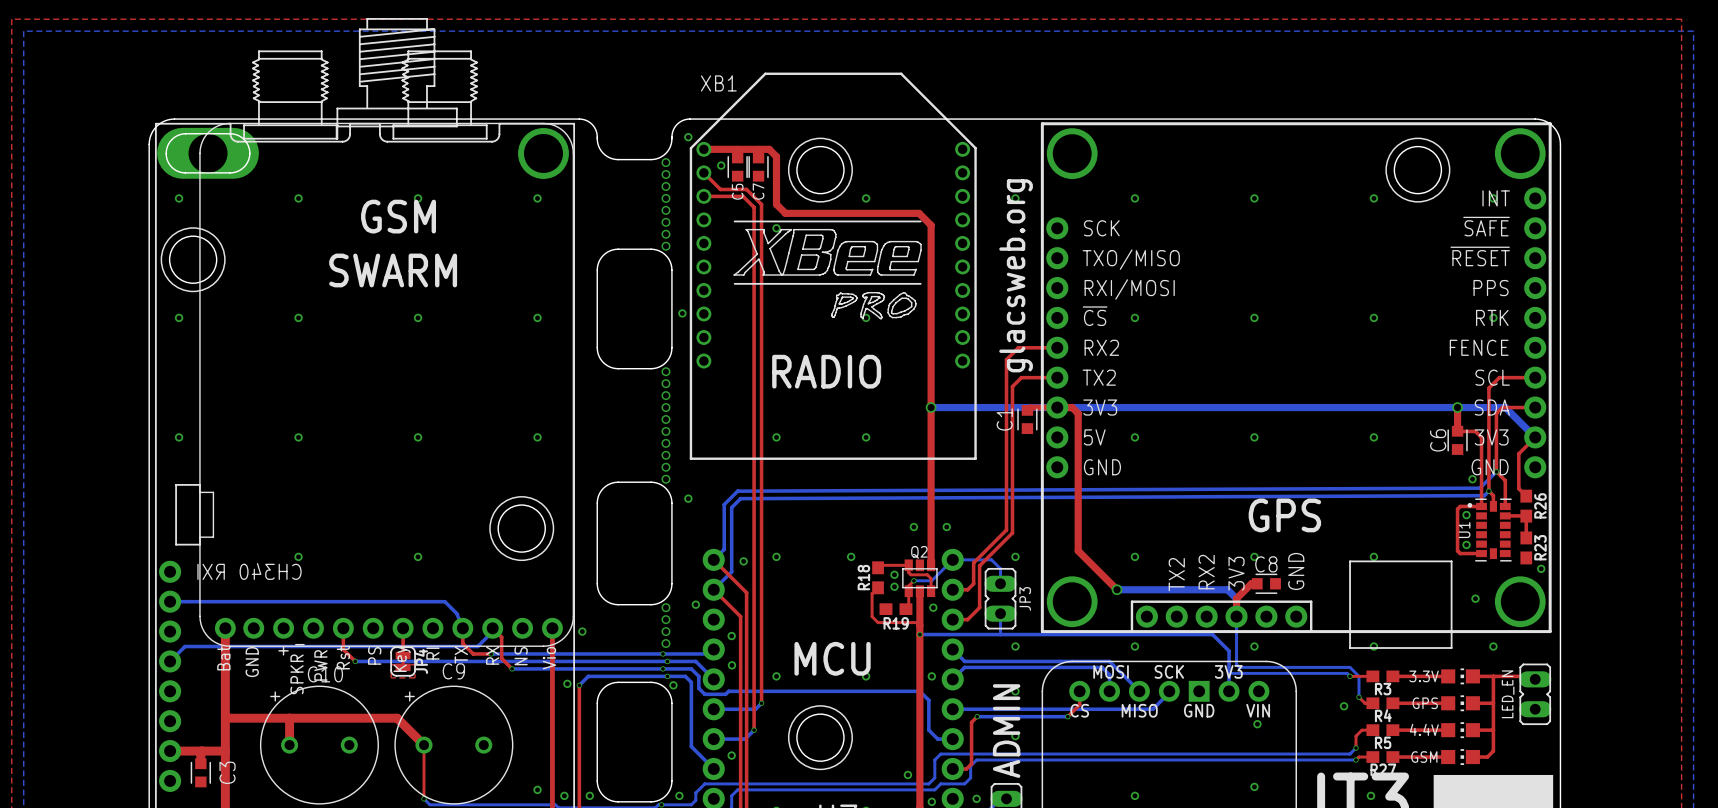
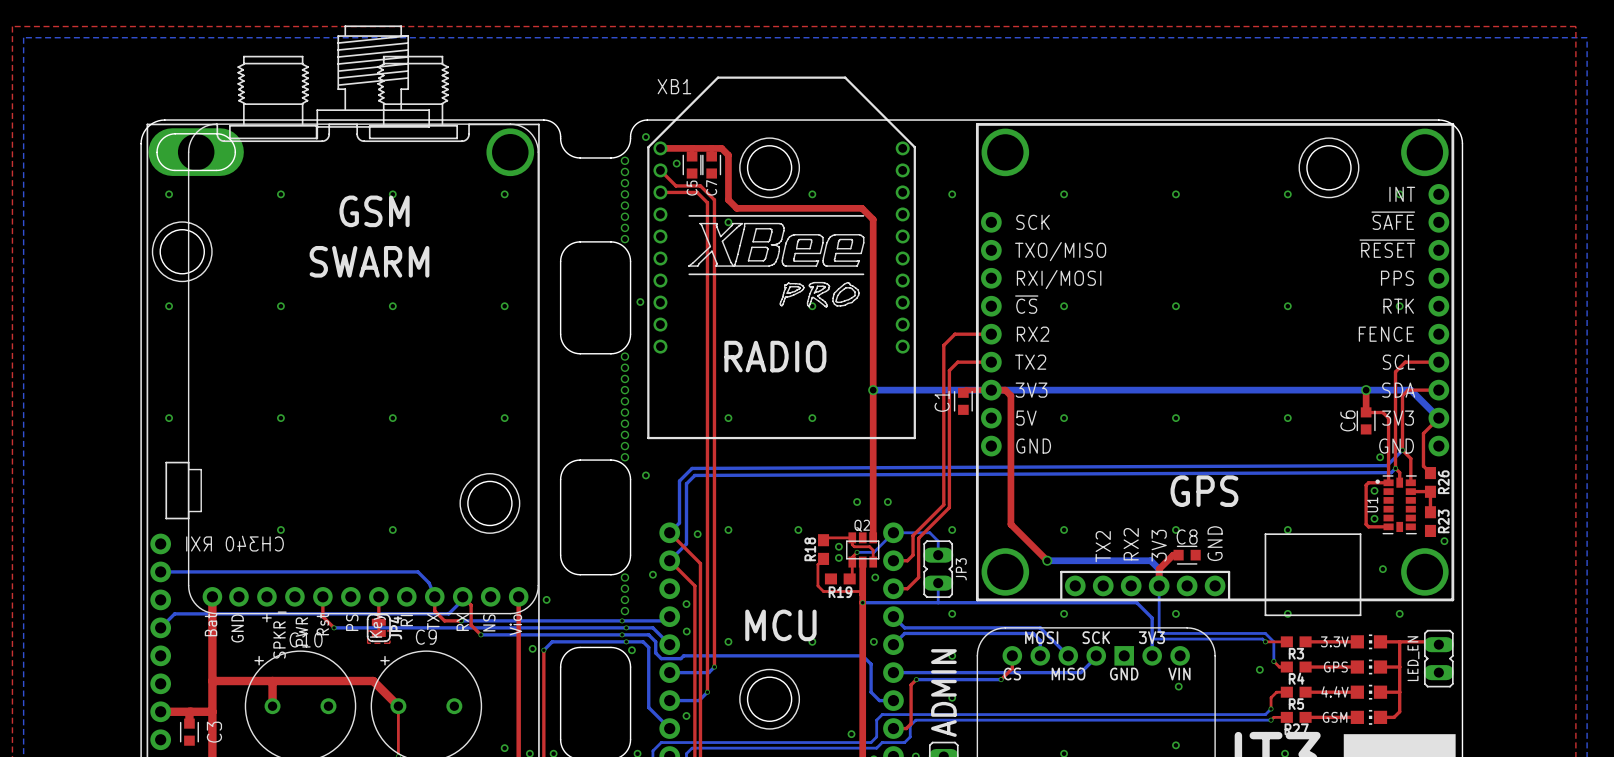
text: glacsweb.org (1016, 275) -> none

